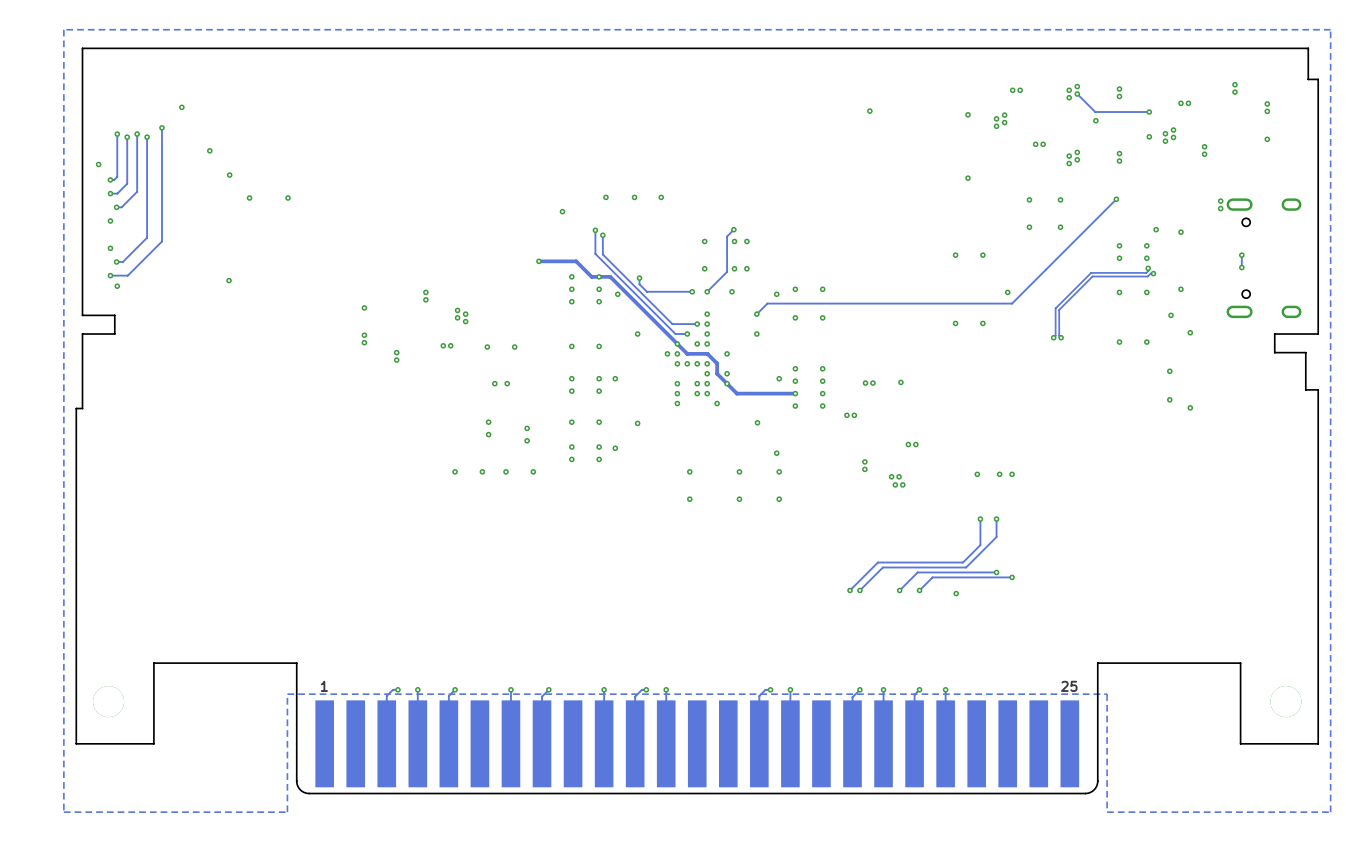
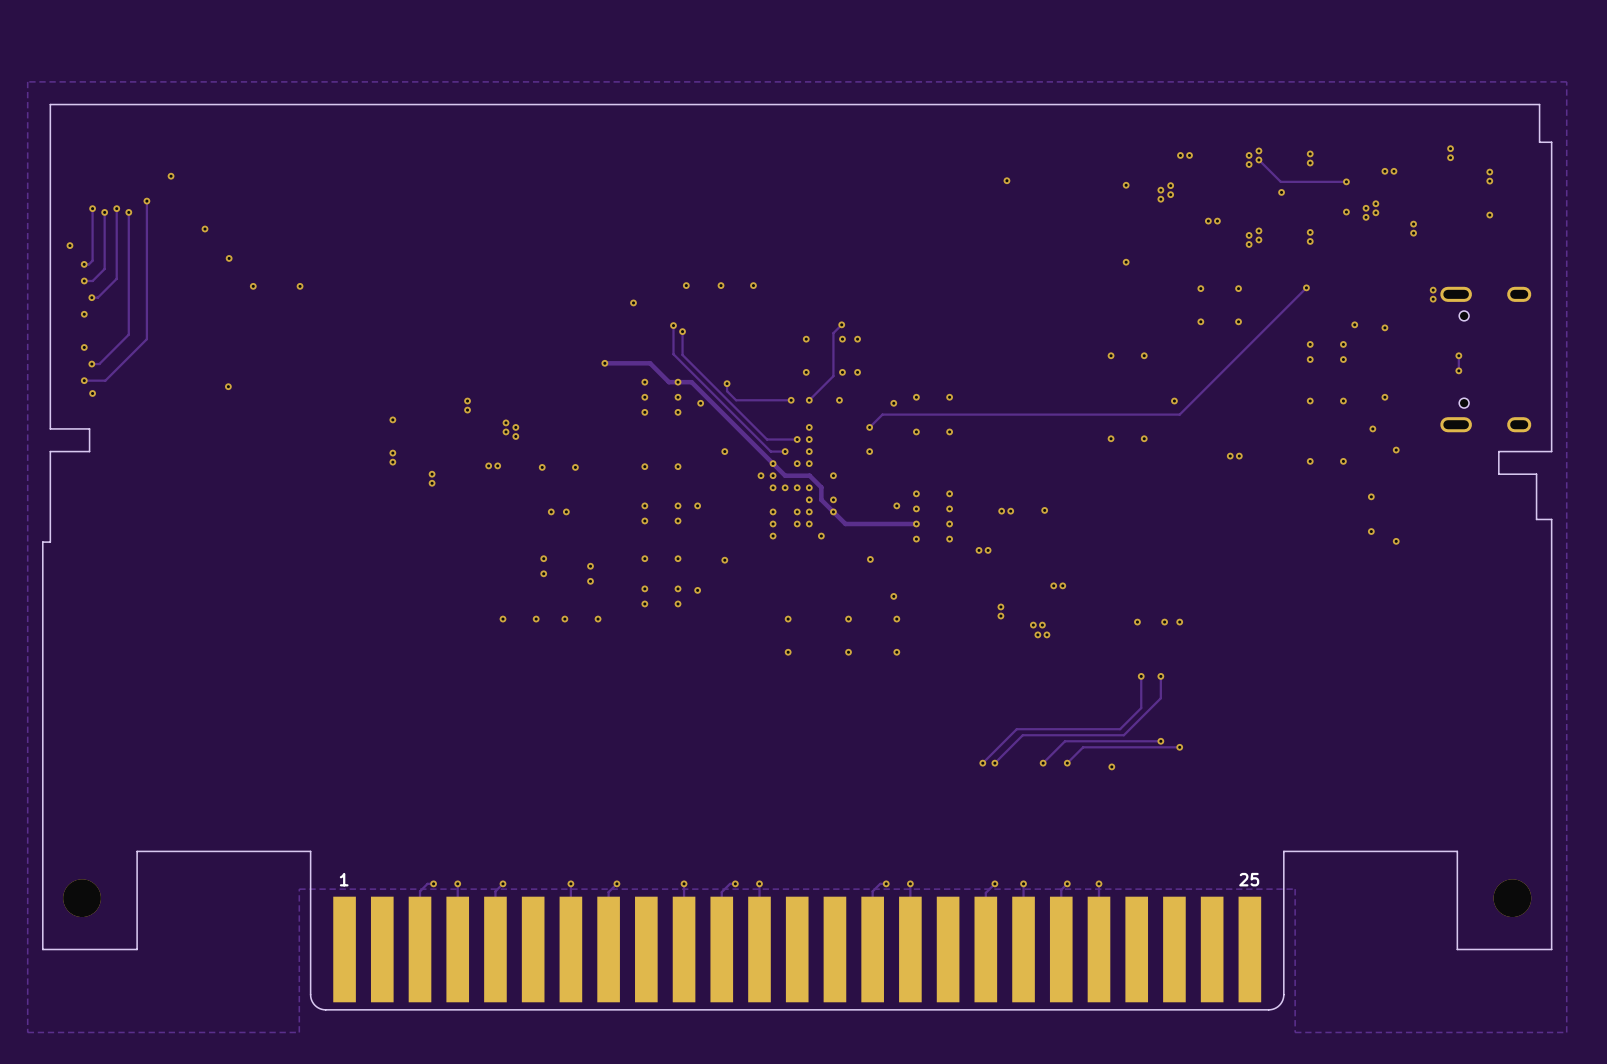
track: (1148, 268) (1146, 272) (1091, 272) (1055, 308) (1055, 335) (1053, 337) -> none
via: (1148, 268) -> none
track: (1153, 273) (1147, 276) (1092, 276) (1059, 309) (1059, 335) (1061, 337) -> none
via: (1153, 273) -> none

